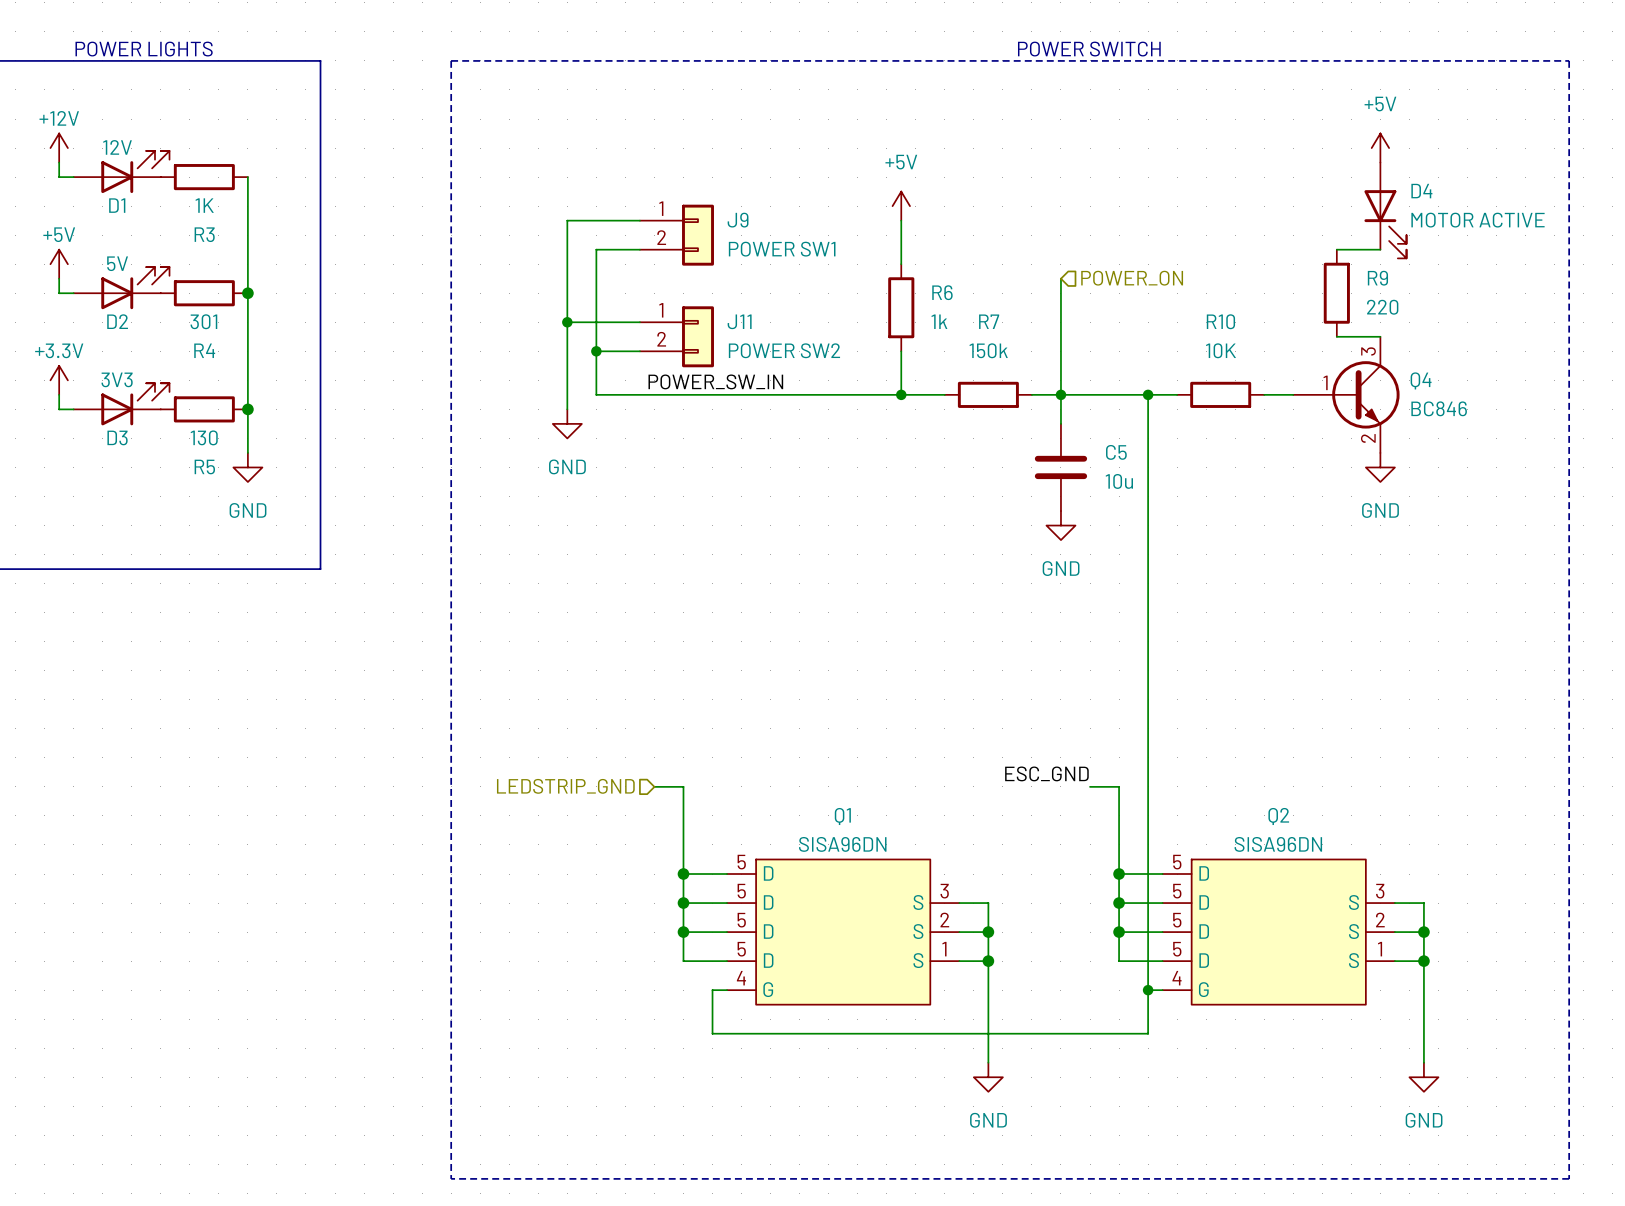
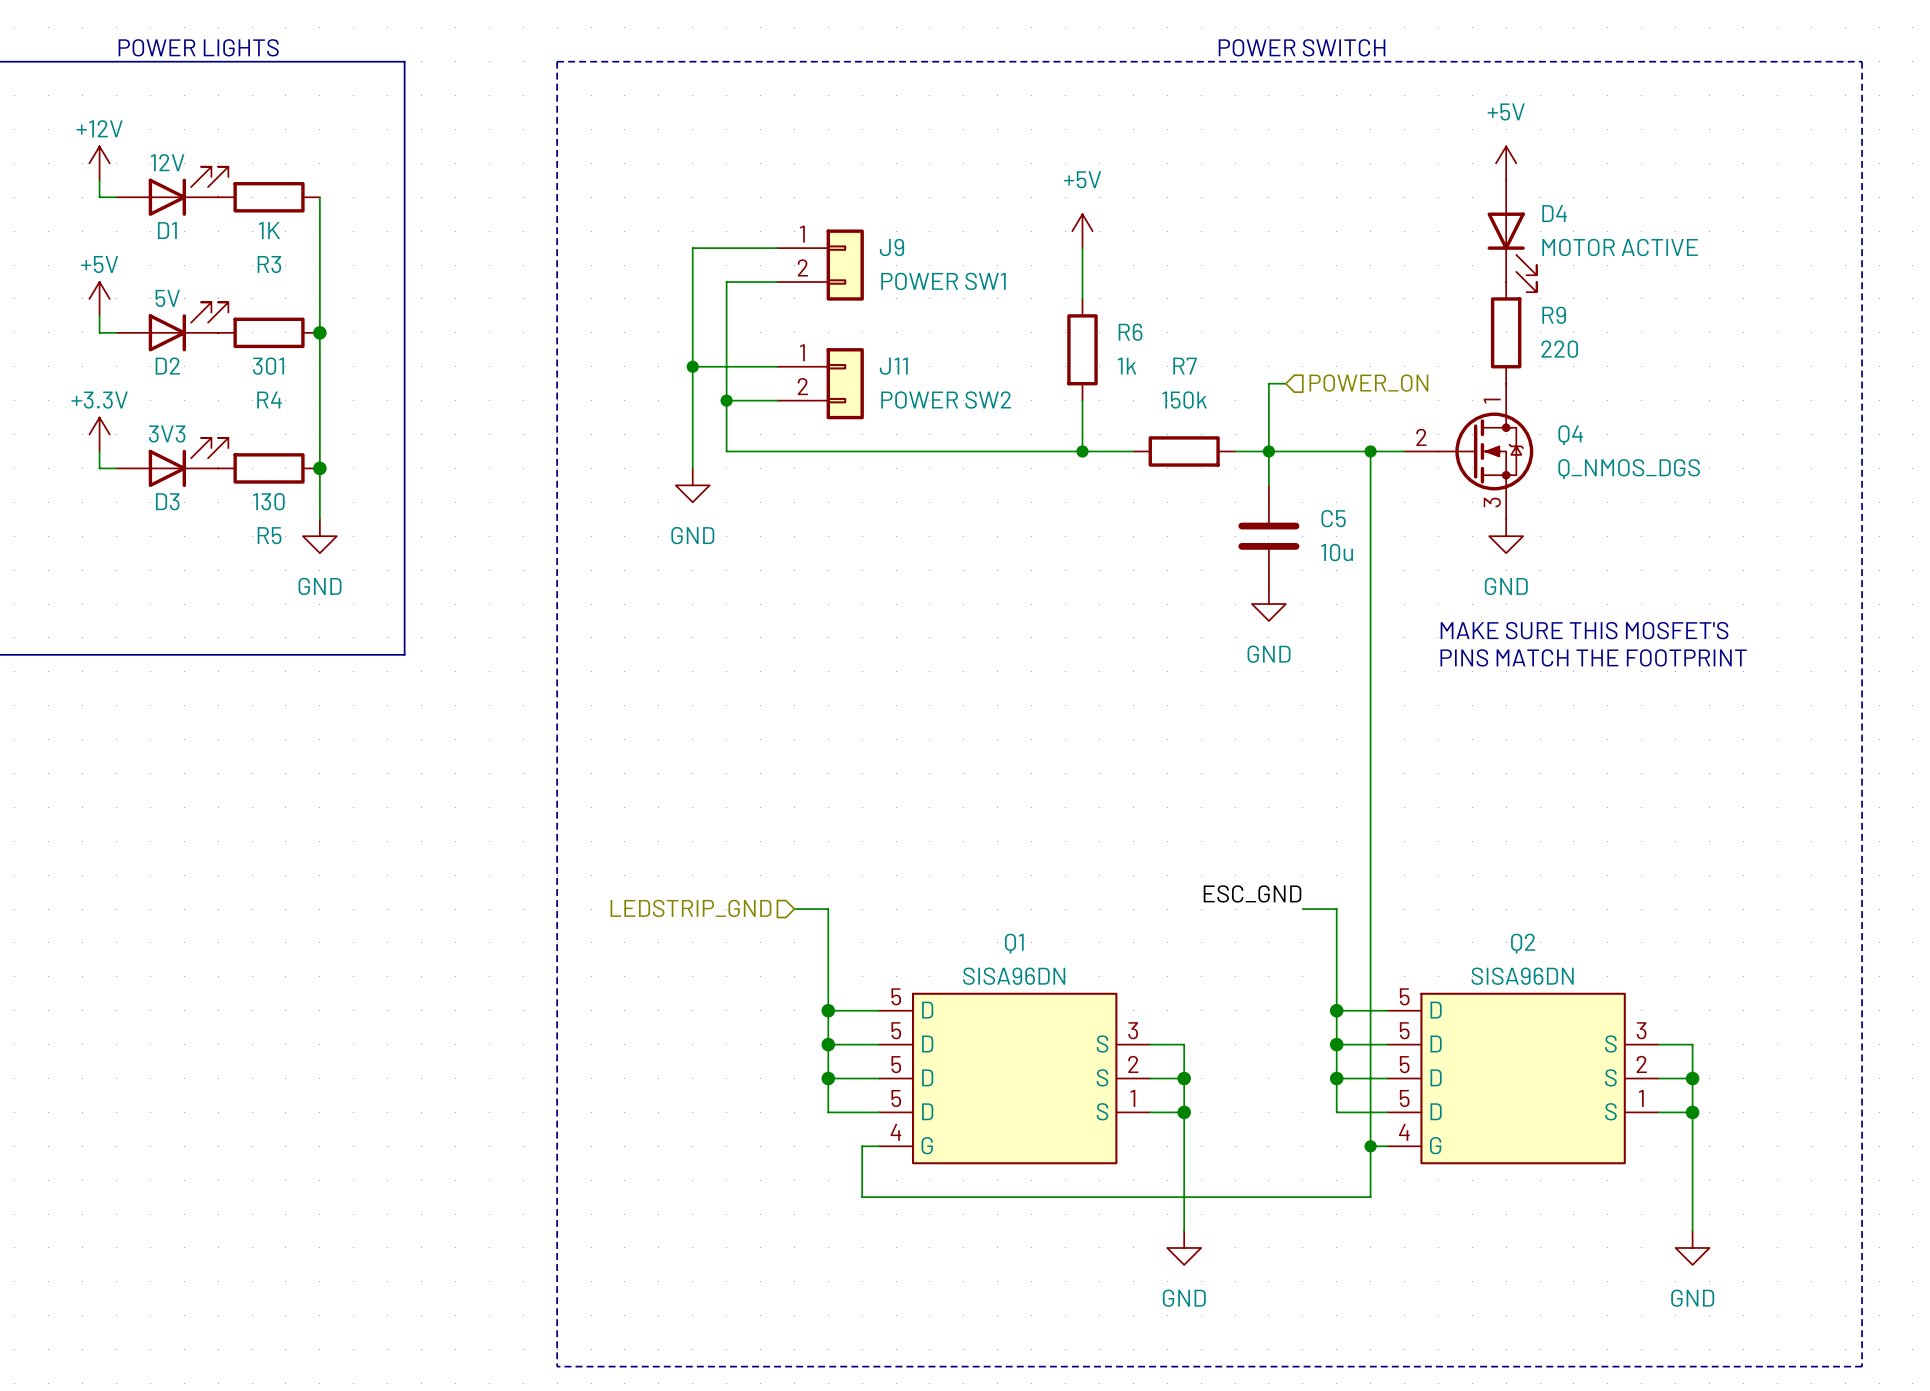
power symbol position: +5V (1380, 148) -> +5V (1506, 163)
D4 position: (1385, 210) -> (1512, 236)
wire: (1336, 249) (1380, 249) -> none
wire: (1060, 278) (1060, 336) -> (1285, 383) (1268, 383)
hierarchical label position: POWER_ON (1132, 278) -> POWER_ON (1368, 383)
R9 position: (1336, 293) -> (1506, 332)
Q4 symbol: [1293, 336, 1400, 453] -> [1404, 383, 1534, 520]
wire: (1336, 336) (1380, 336) -> none
label: POWER_SW_IN (715, 381) -> none
R10: 10K (1220, 394) -> none
wire: (1264, 394) (1293, 394) -> none
Q4 value: BC846 (1439, 408) -> Q_NMOS_DGS (1629, 469)
power symbol position: GND (1380, 467) -> GND (1506, 536)
text: none -> MAKE SURE THIS MOSFET'S (1584, 630)
text: none -> PINS MATCH THE FOOTPRINT (1593, 657)

